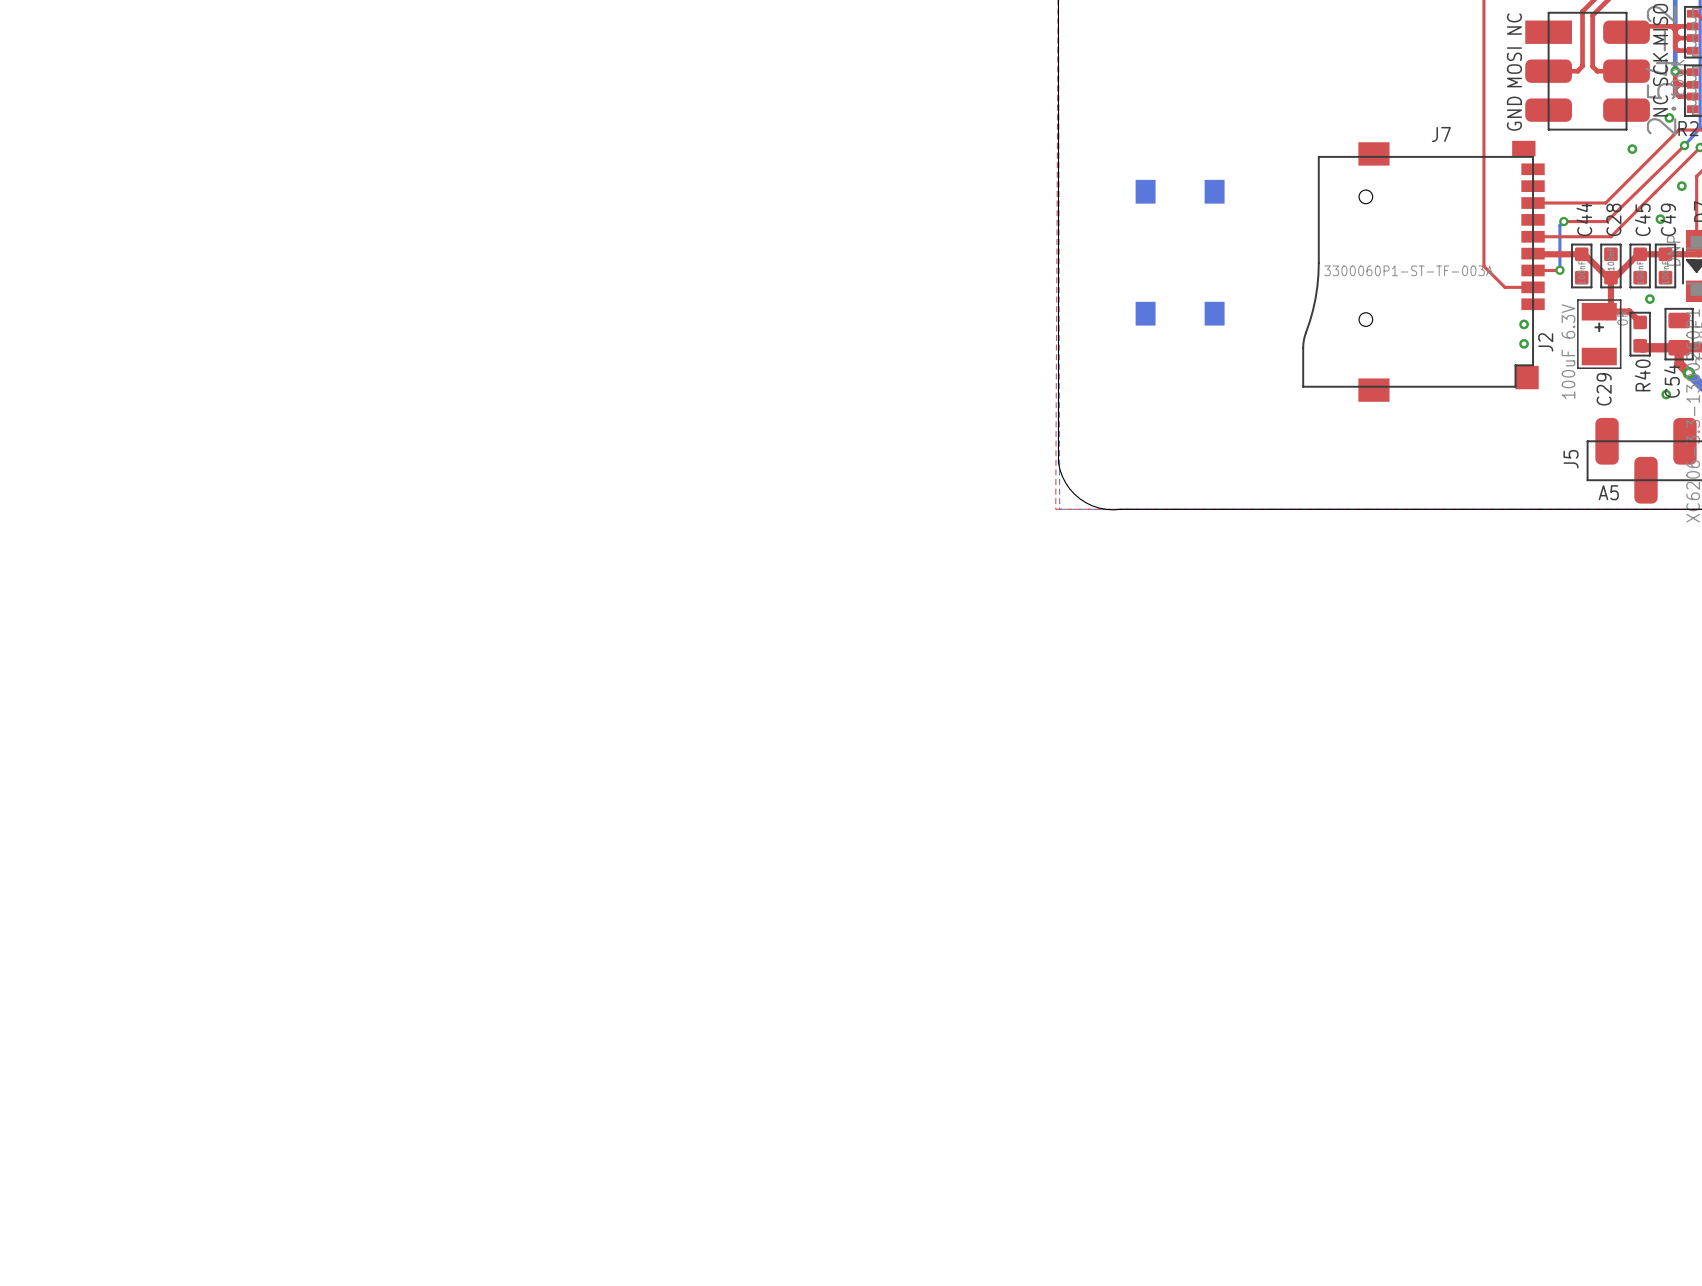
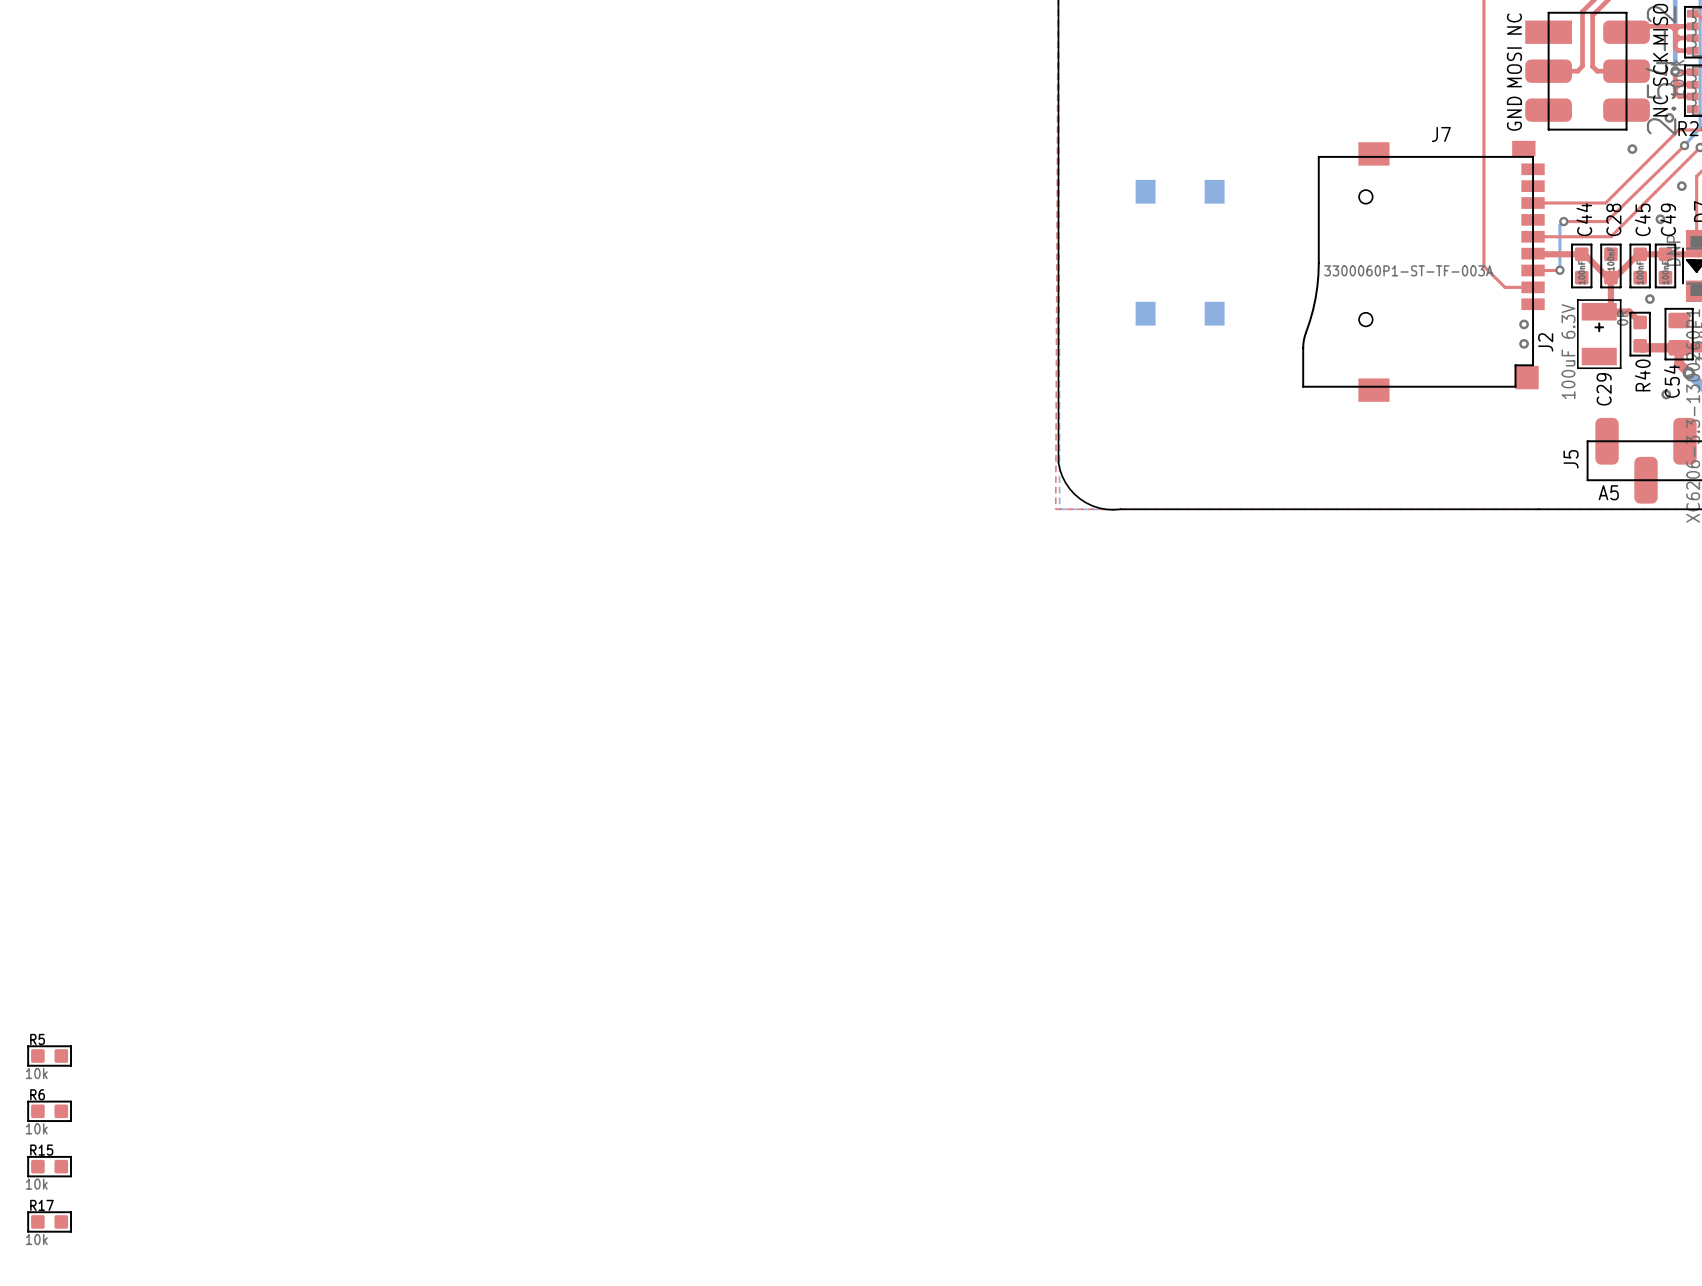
R5: none -> 10k (49, 1056)
R6: none -> 10k (49, 1111)
R15: none -> 10k (49, 1166)
R17: none -> 10k (49, 1221)

